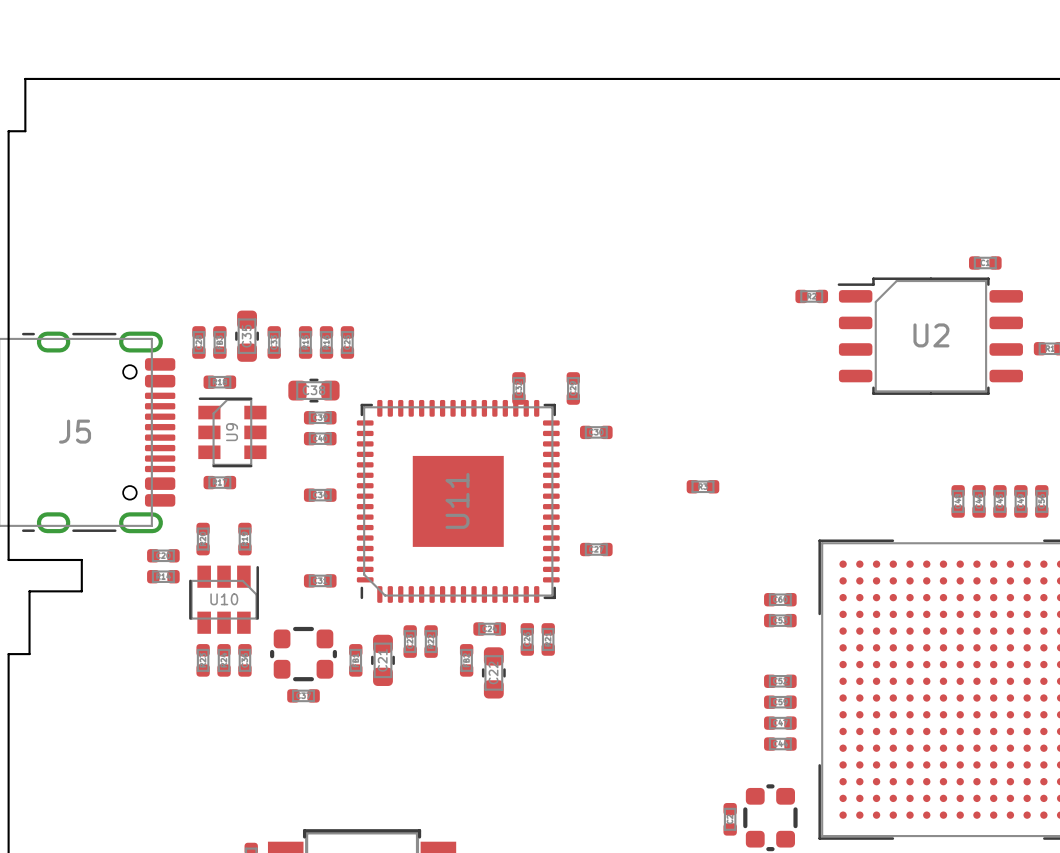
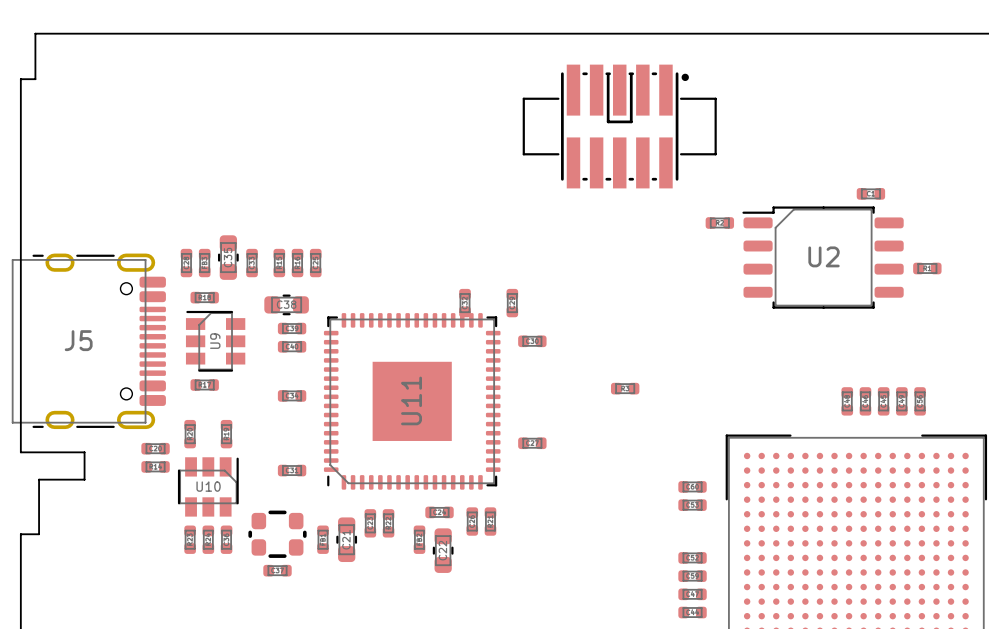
part: none -> (619, 126)

